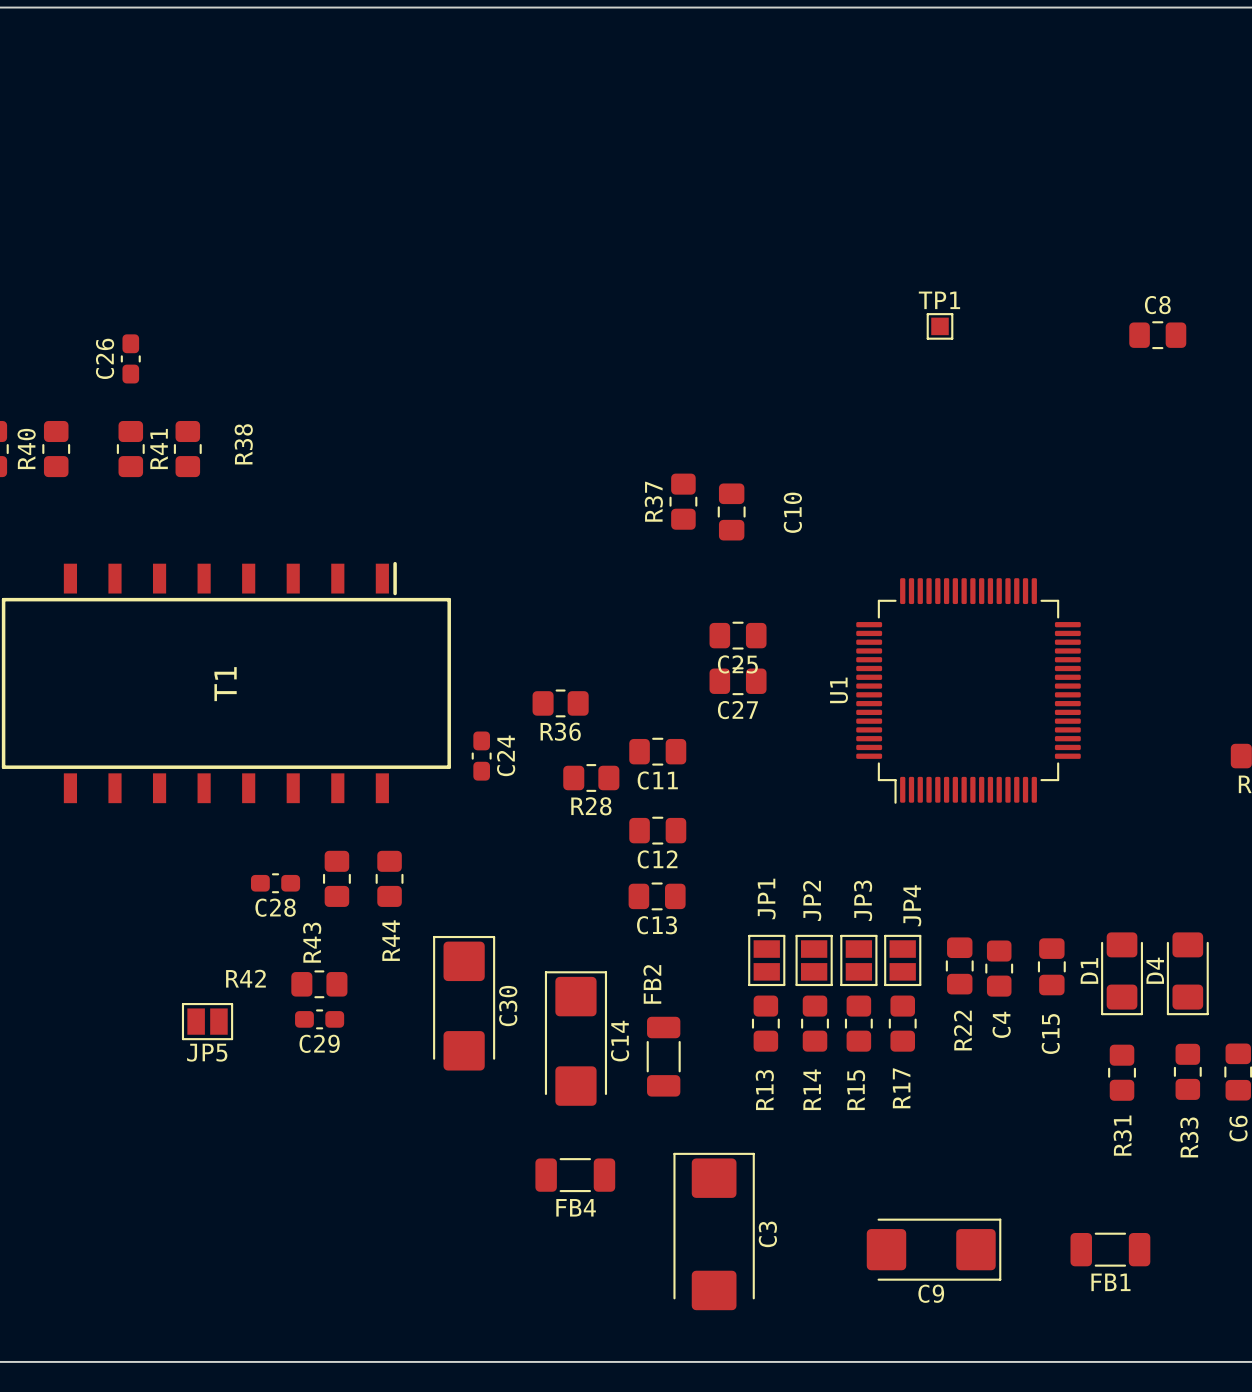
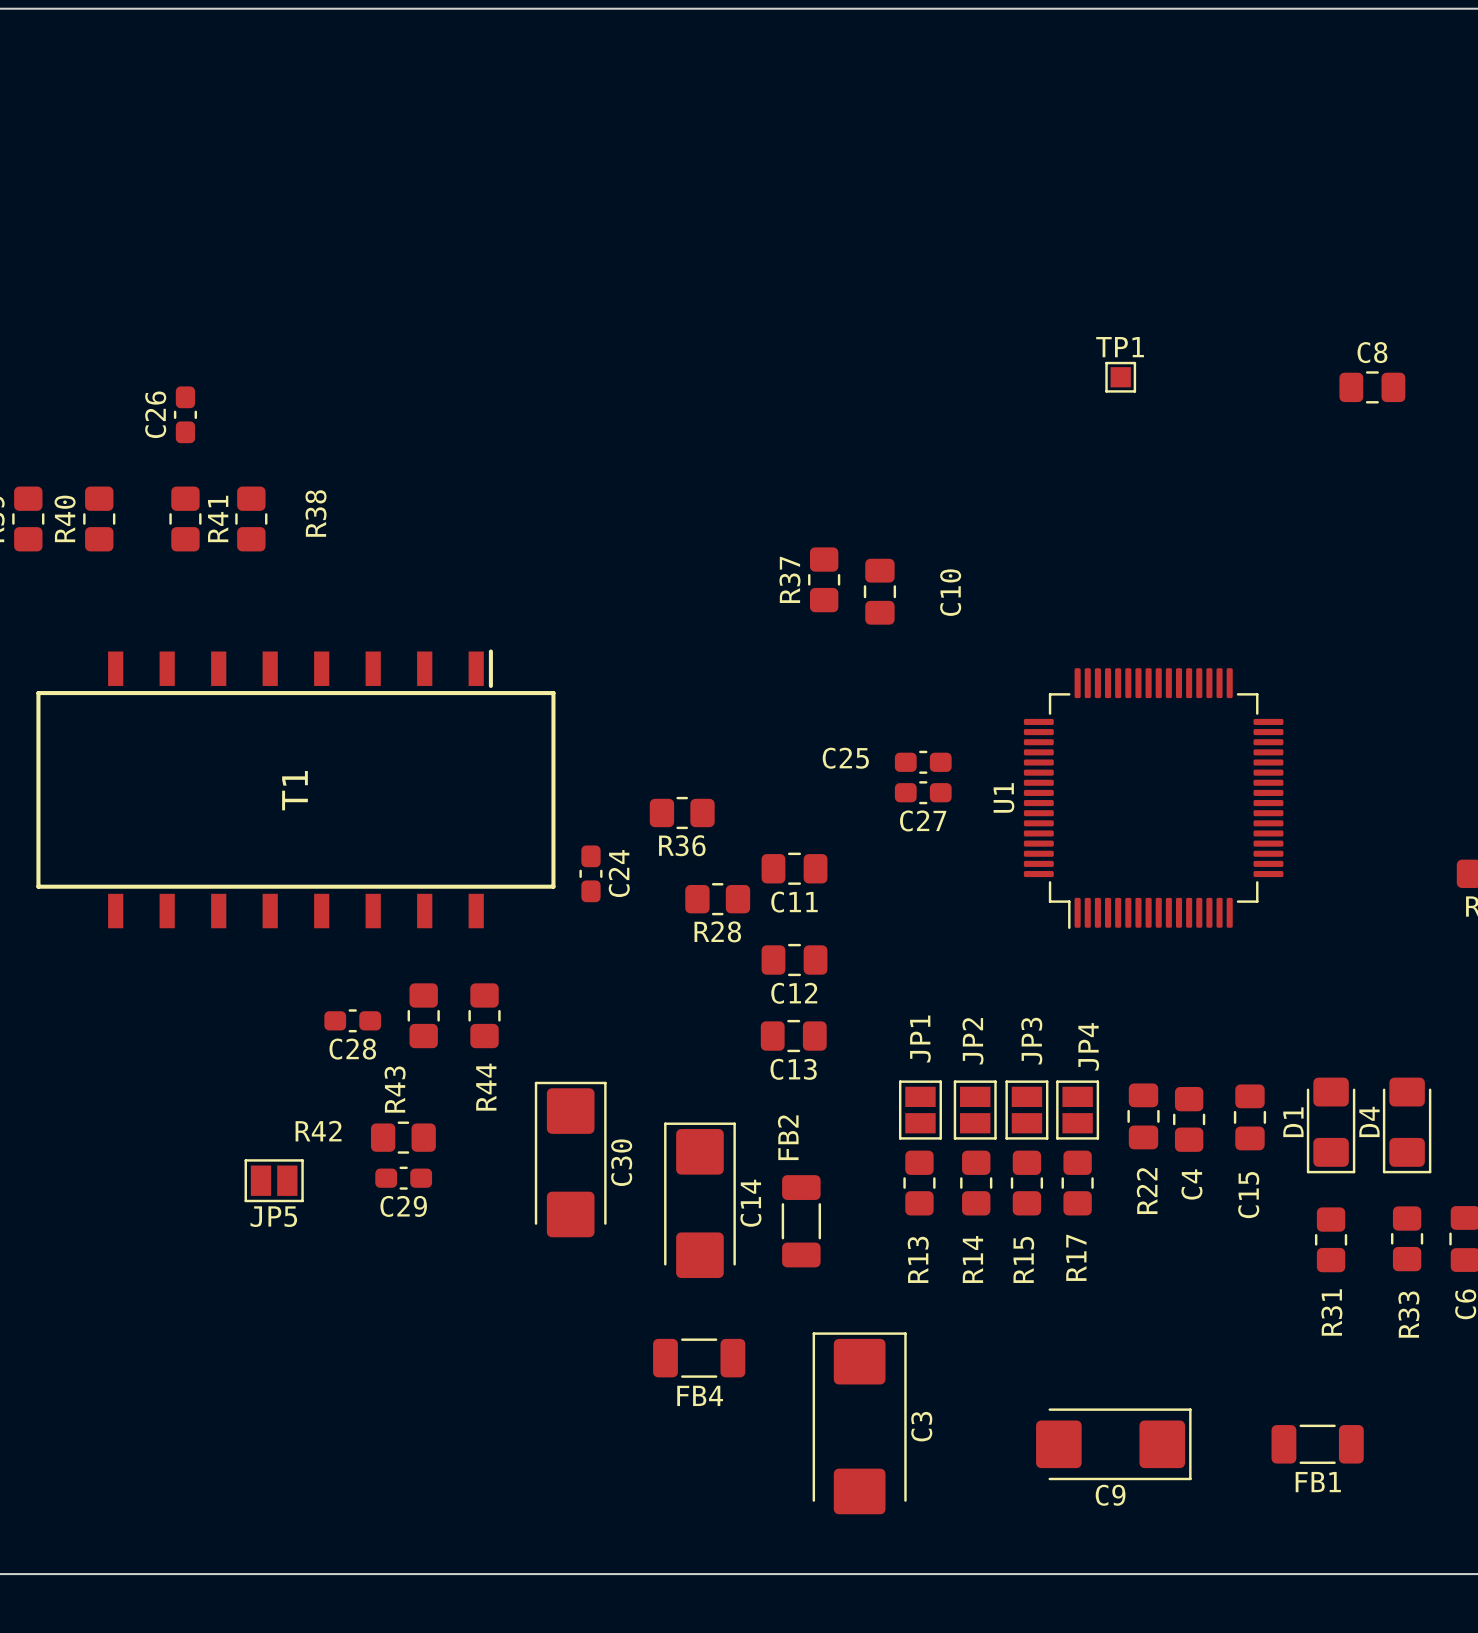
C25 footprint: [709, 621, 767, 650] -> [894, 750, 952, 774]
C25 name position: C25 (737, 664) -> C25 (845, 758)
C27 footprint: [709, 667, 767, 696] -> [894, 781, 952, 805]

